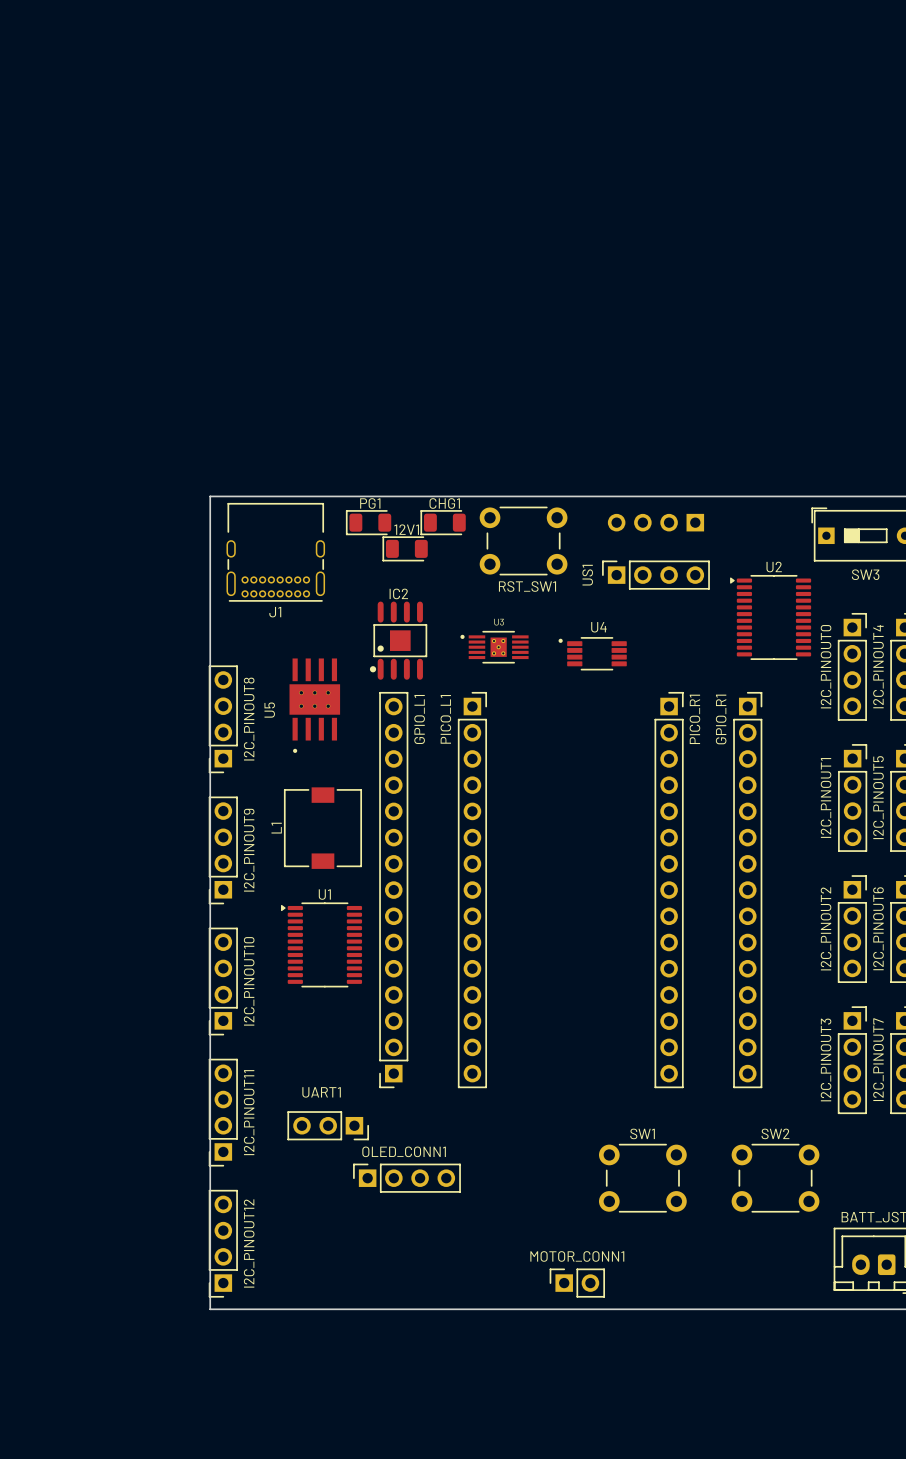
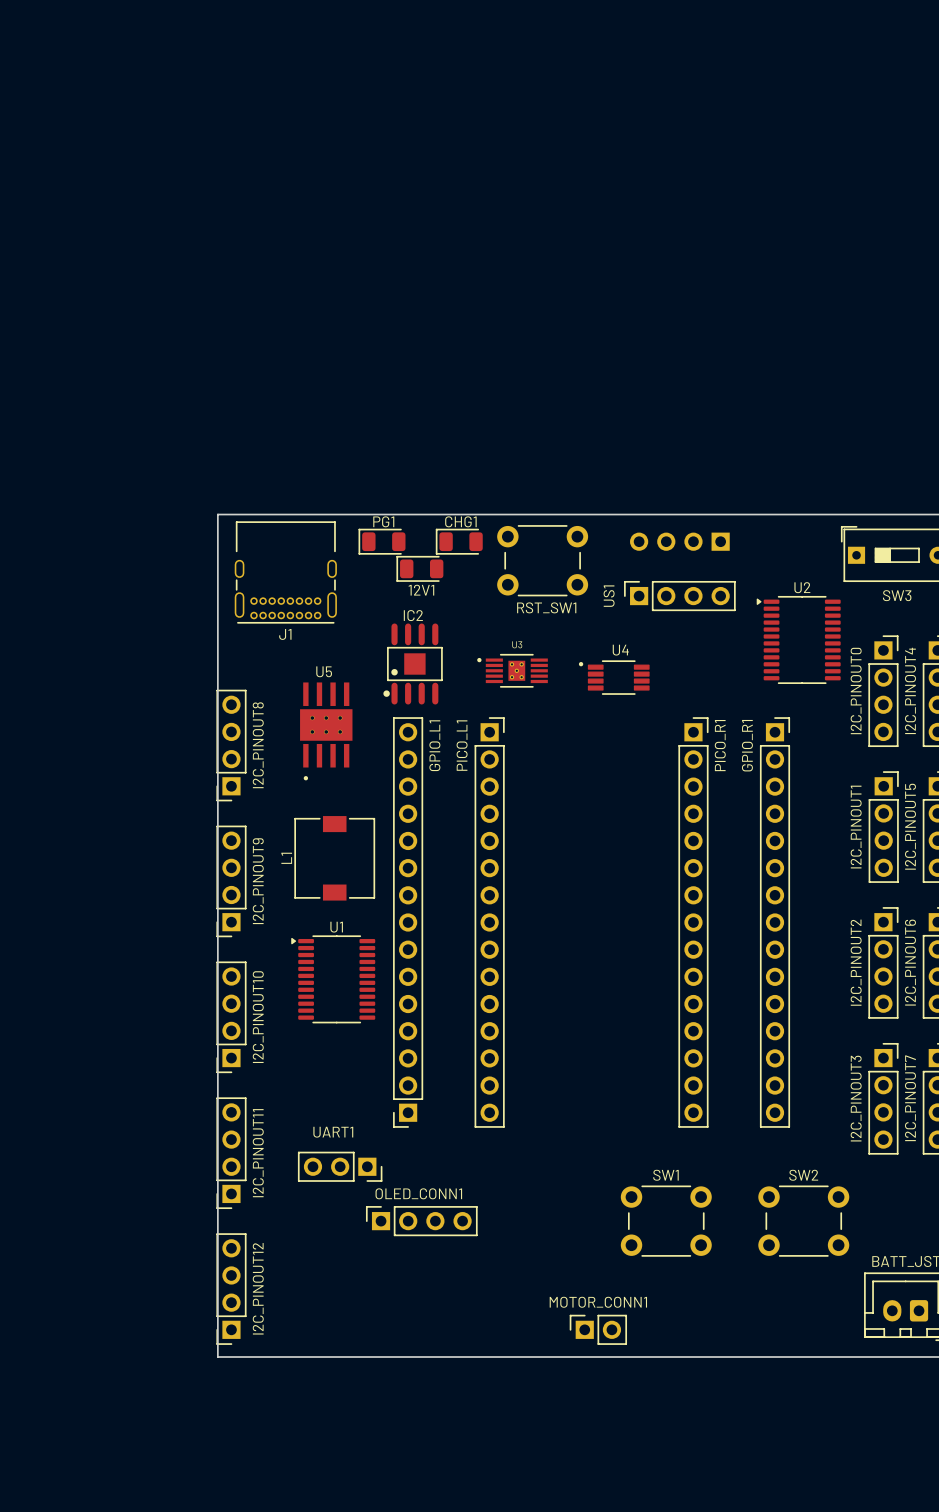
12V1 name position: 12V1 (406, 529) -> 12V1 (421, 590)
U5 name rotation: 0° (269, 710) -> 90° clockwise (324, 671)
U5 name position: U5 (269, 710) -> U5 (324, 671)

